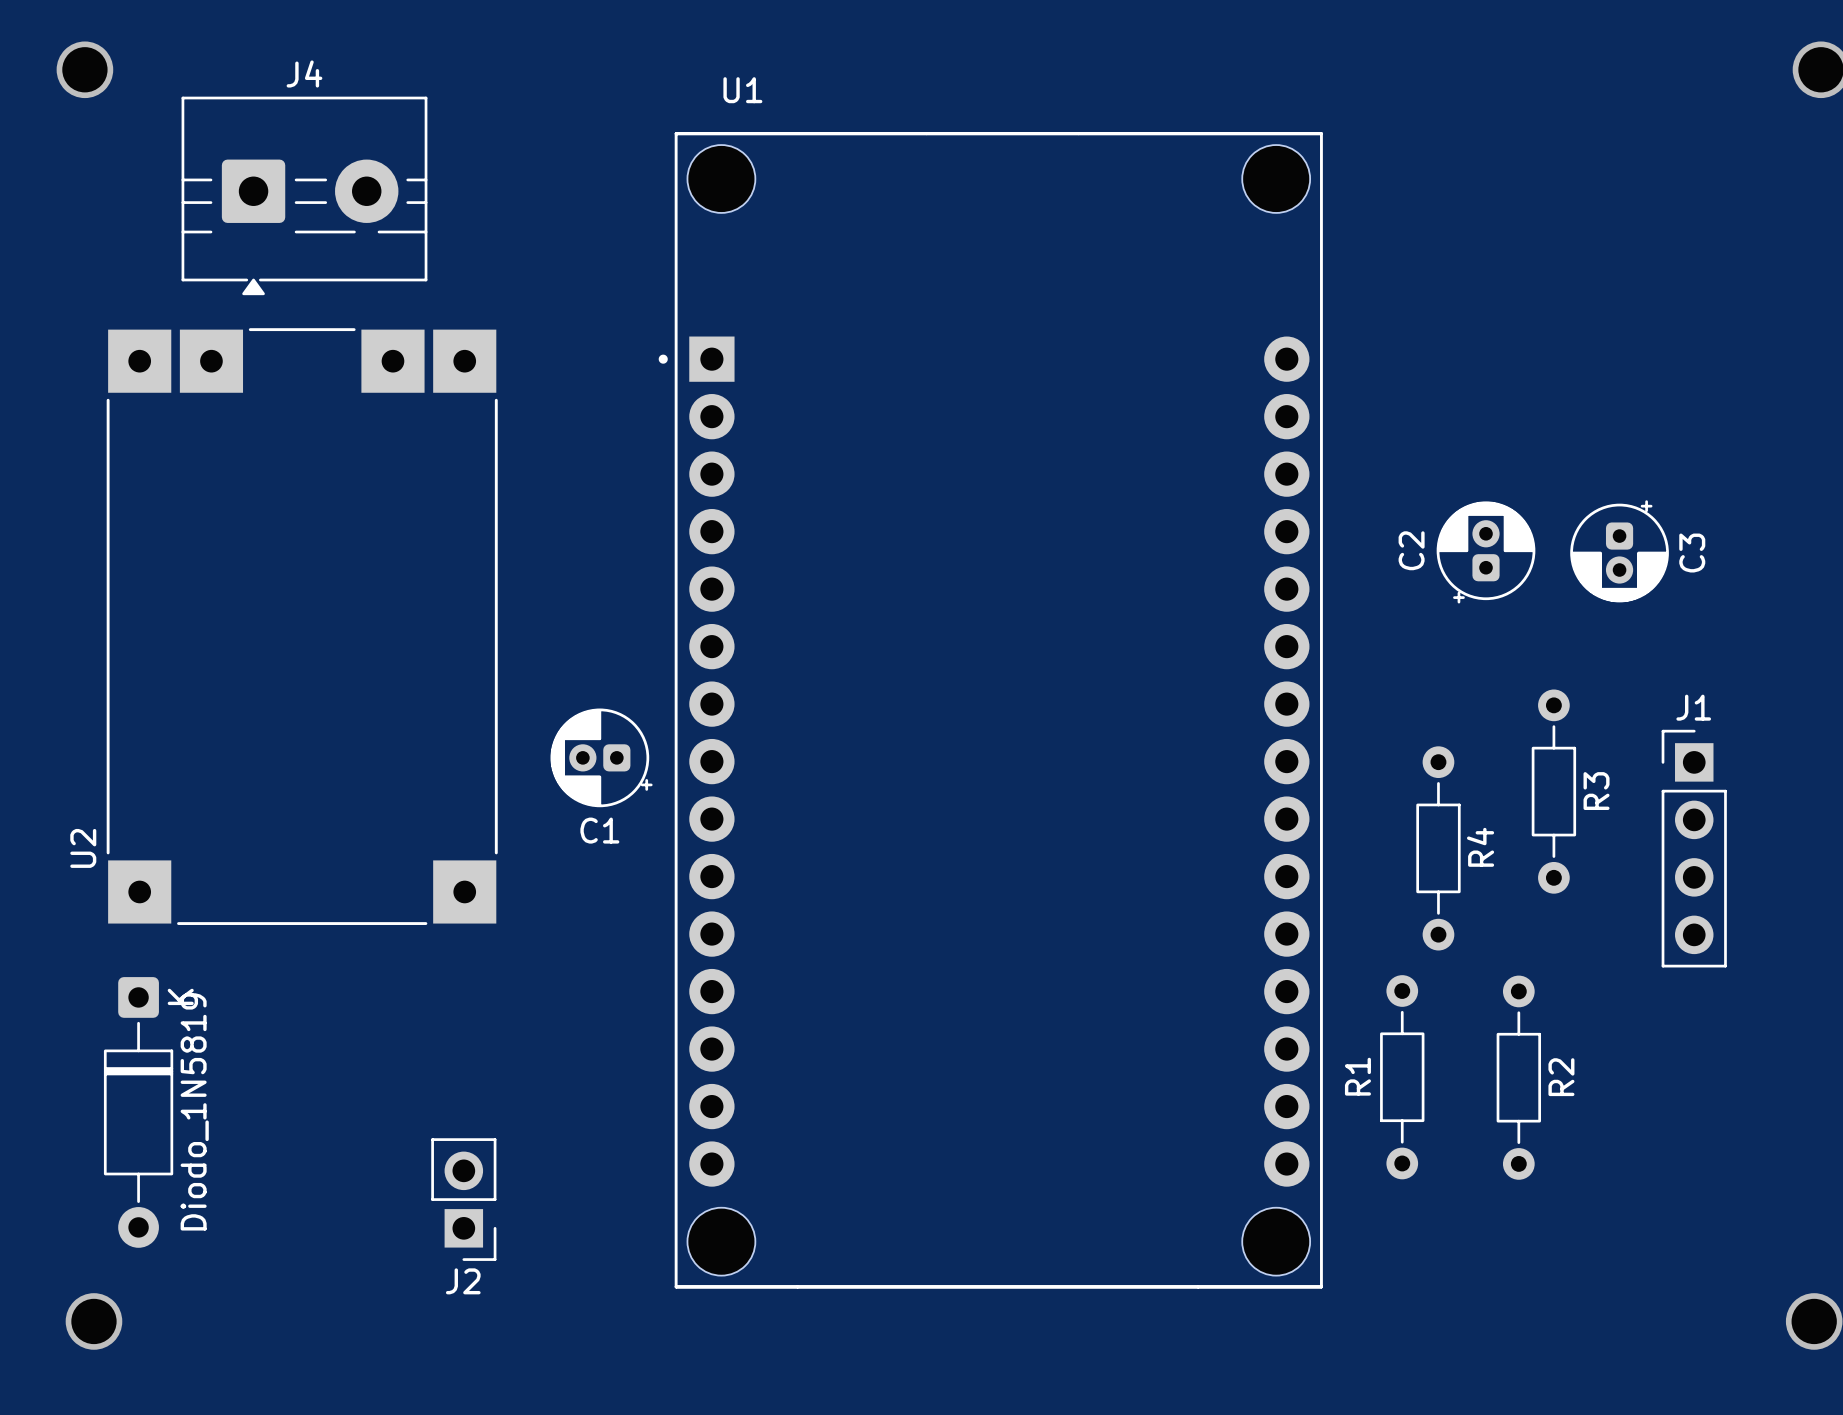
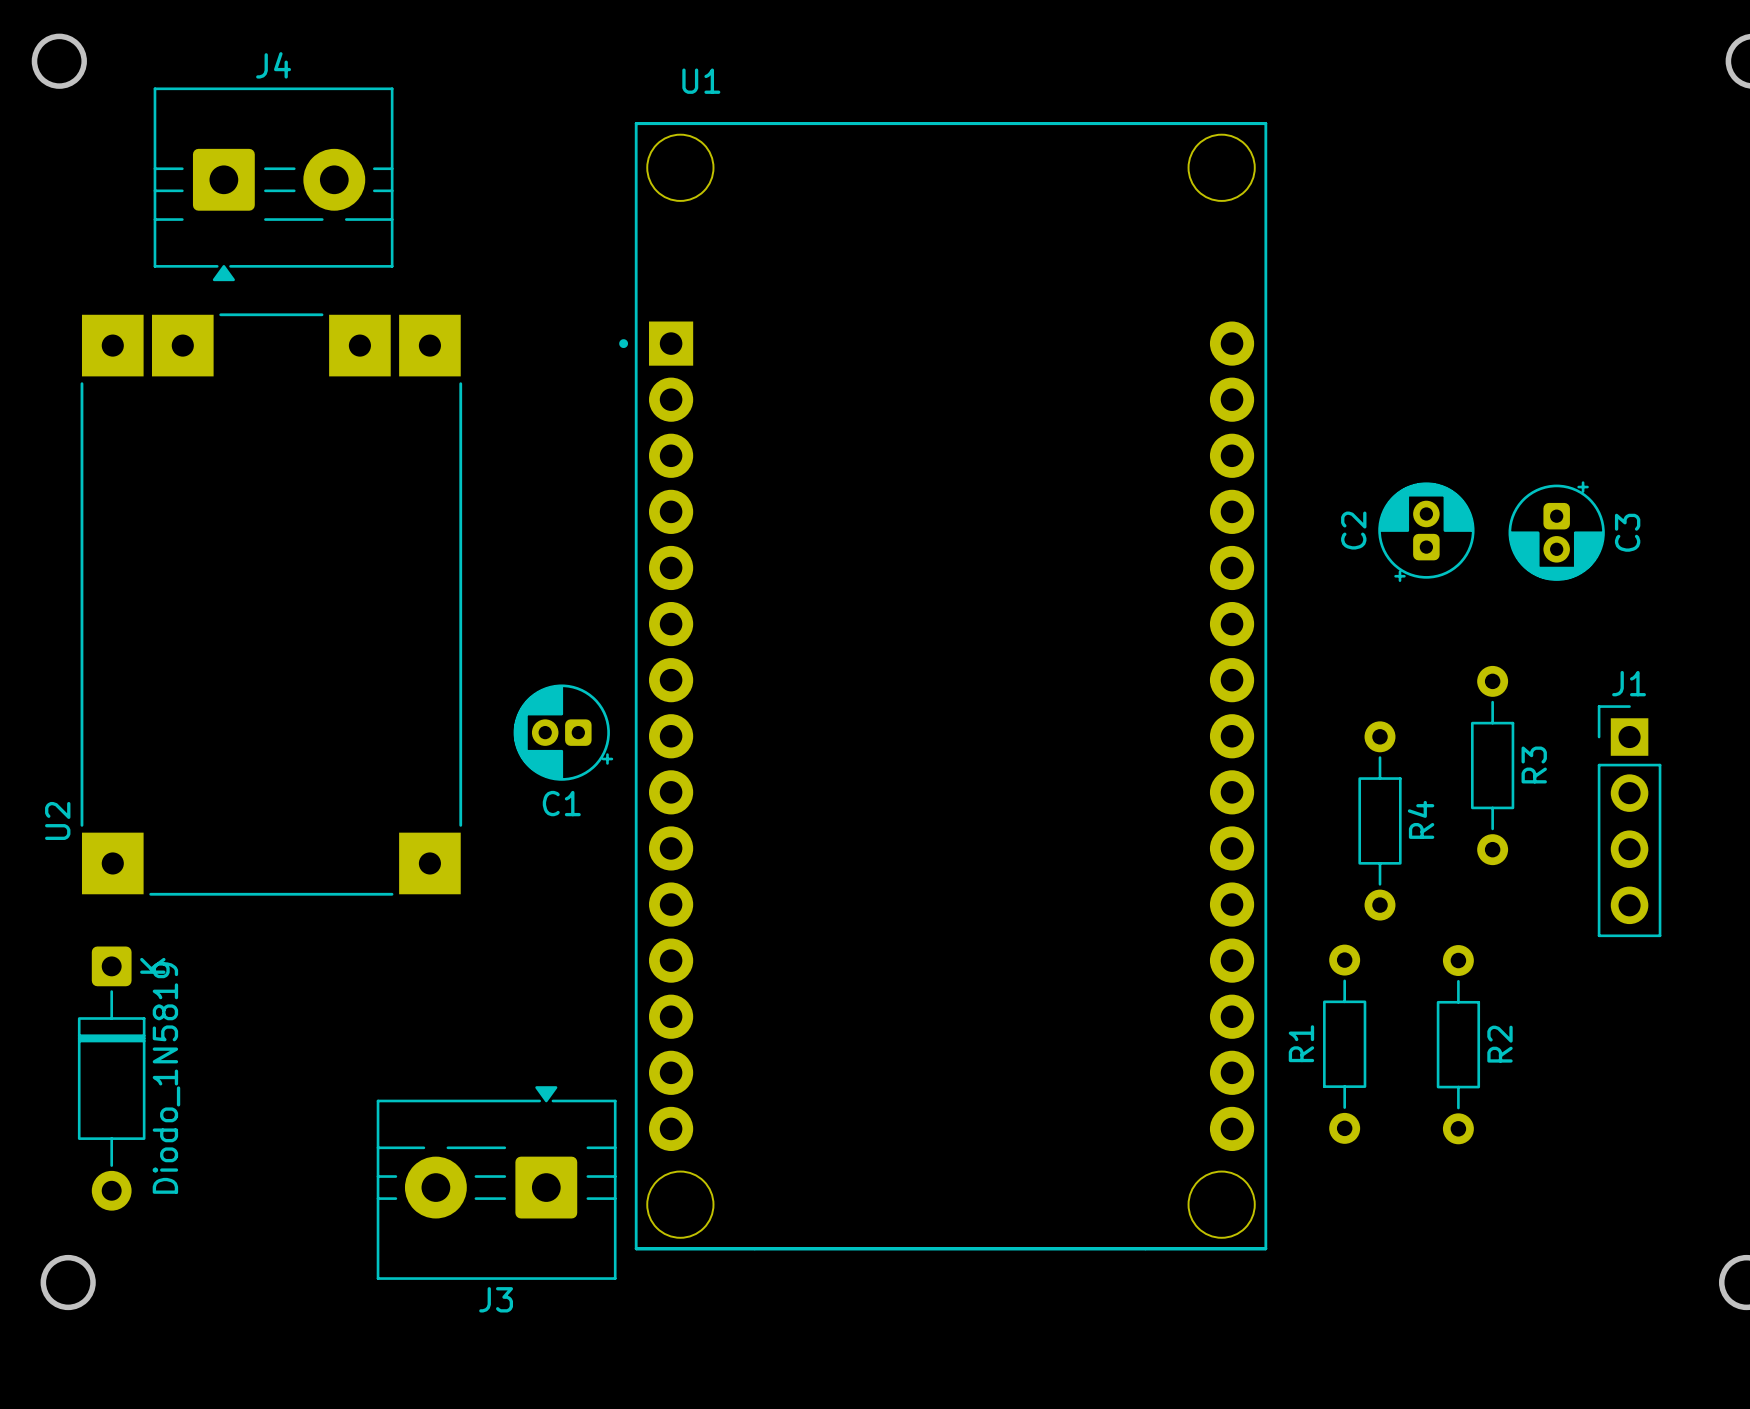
J2: (463, 1199) -> none
J3: none -> (496, 1183)

